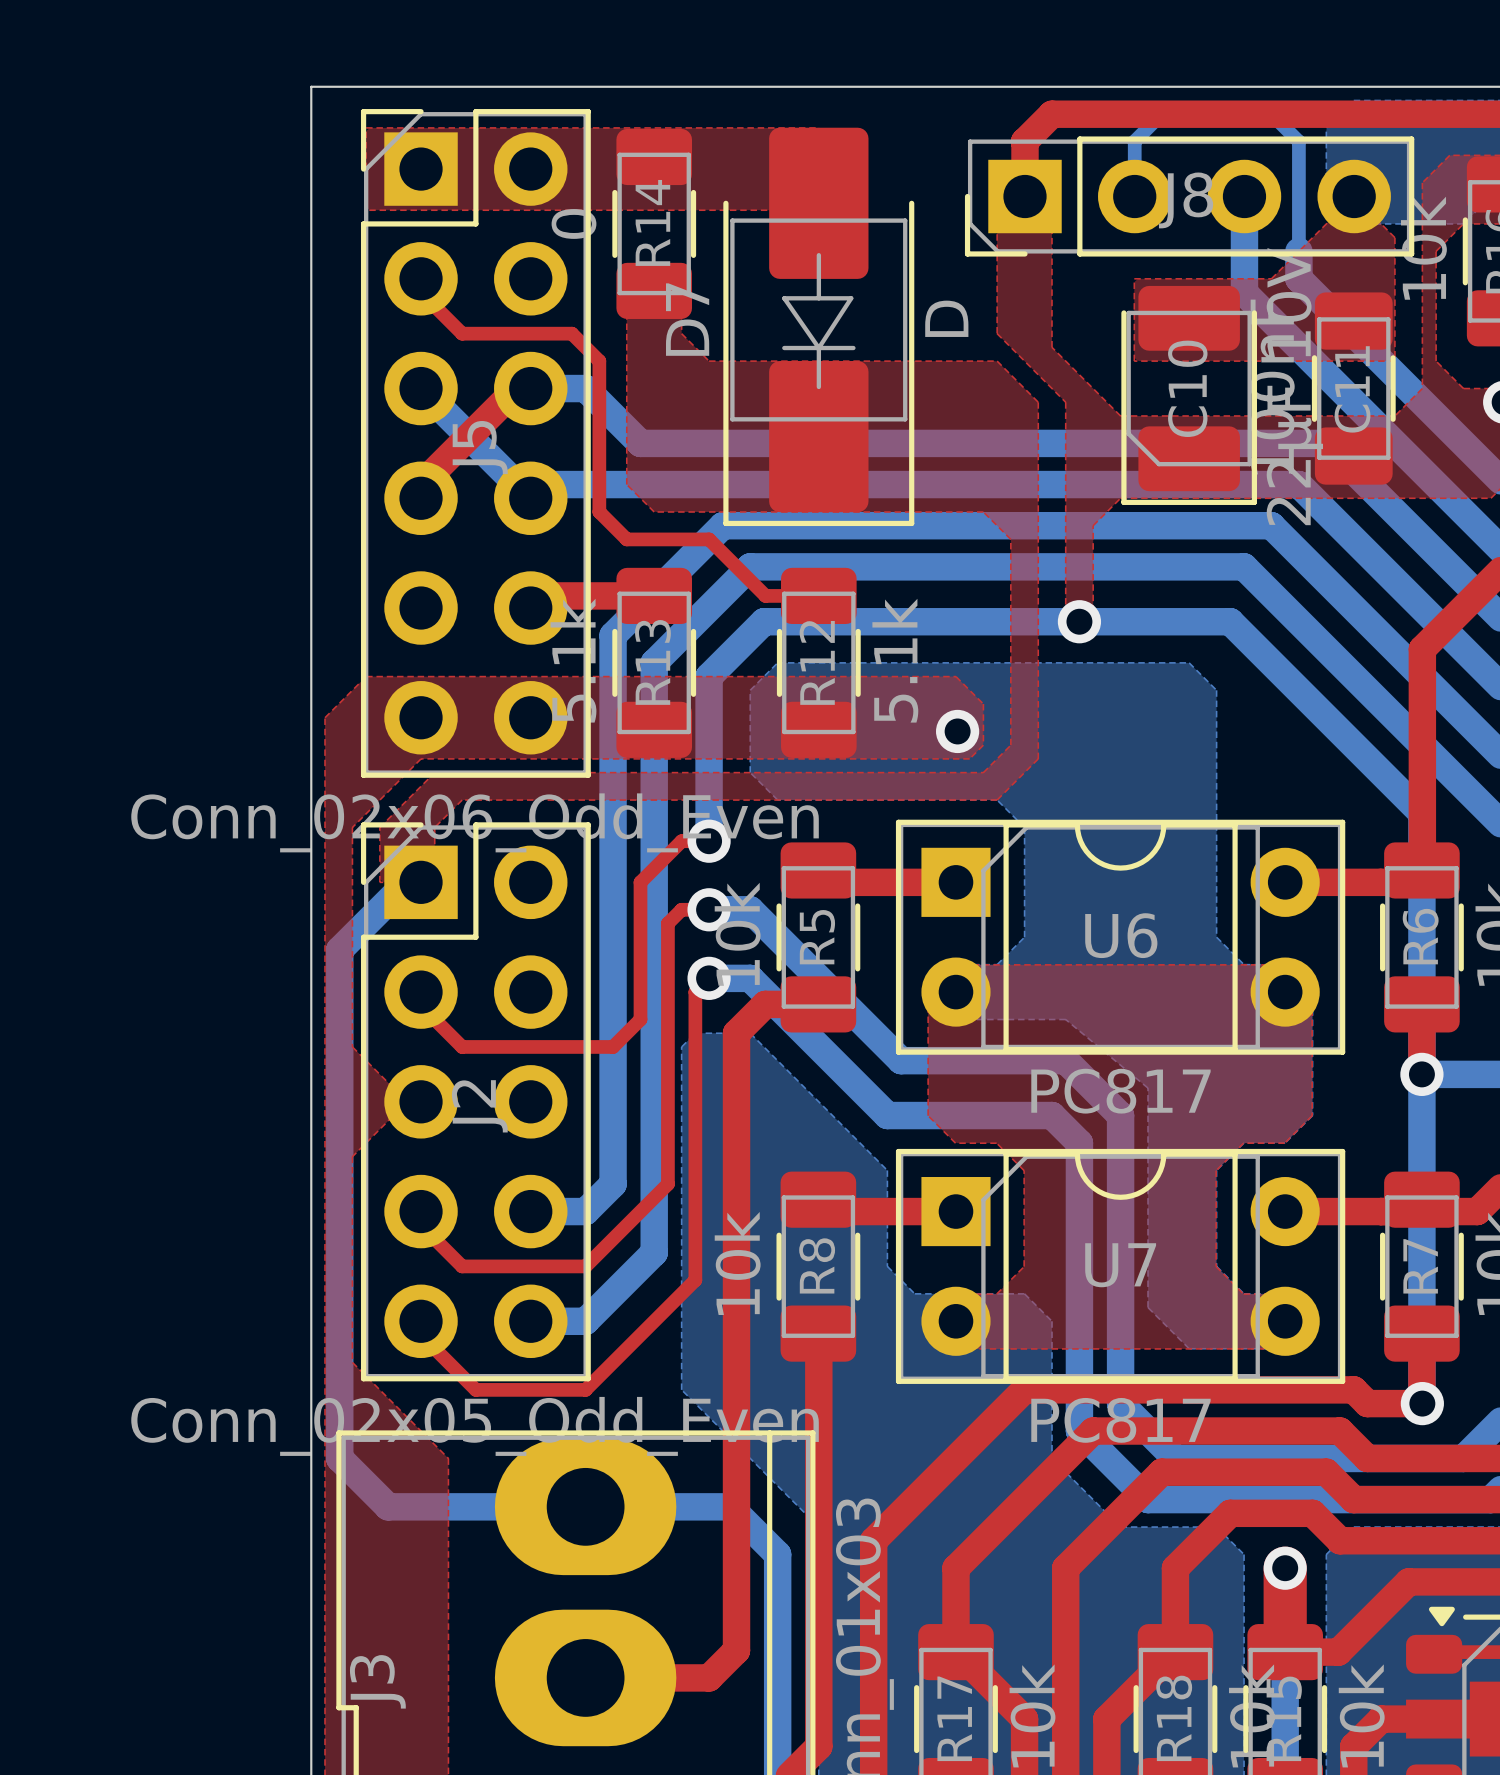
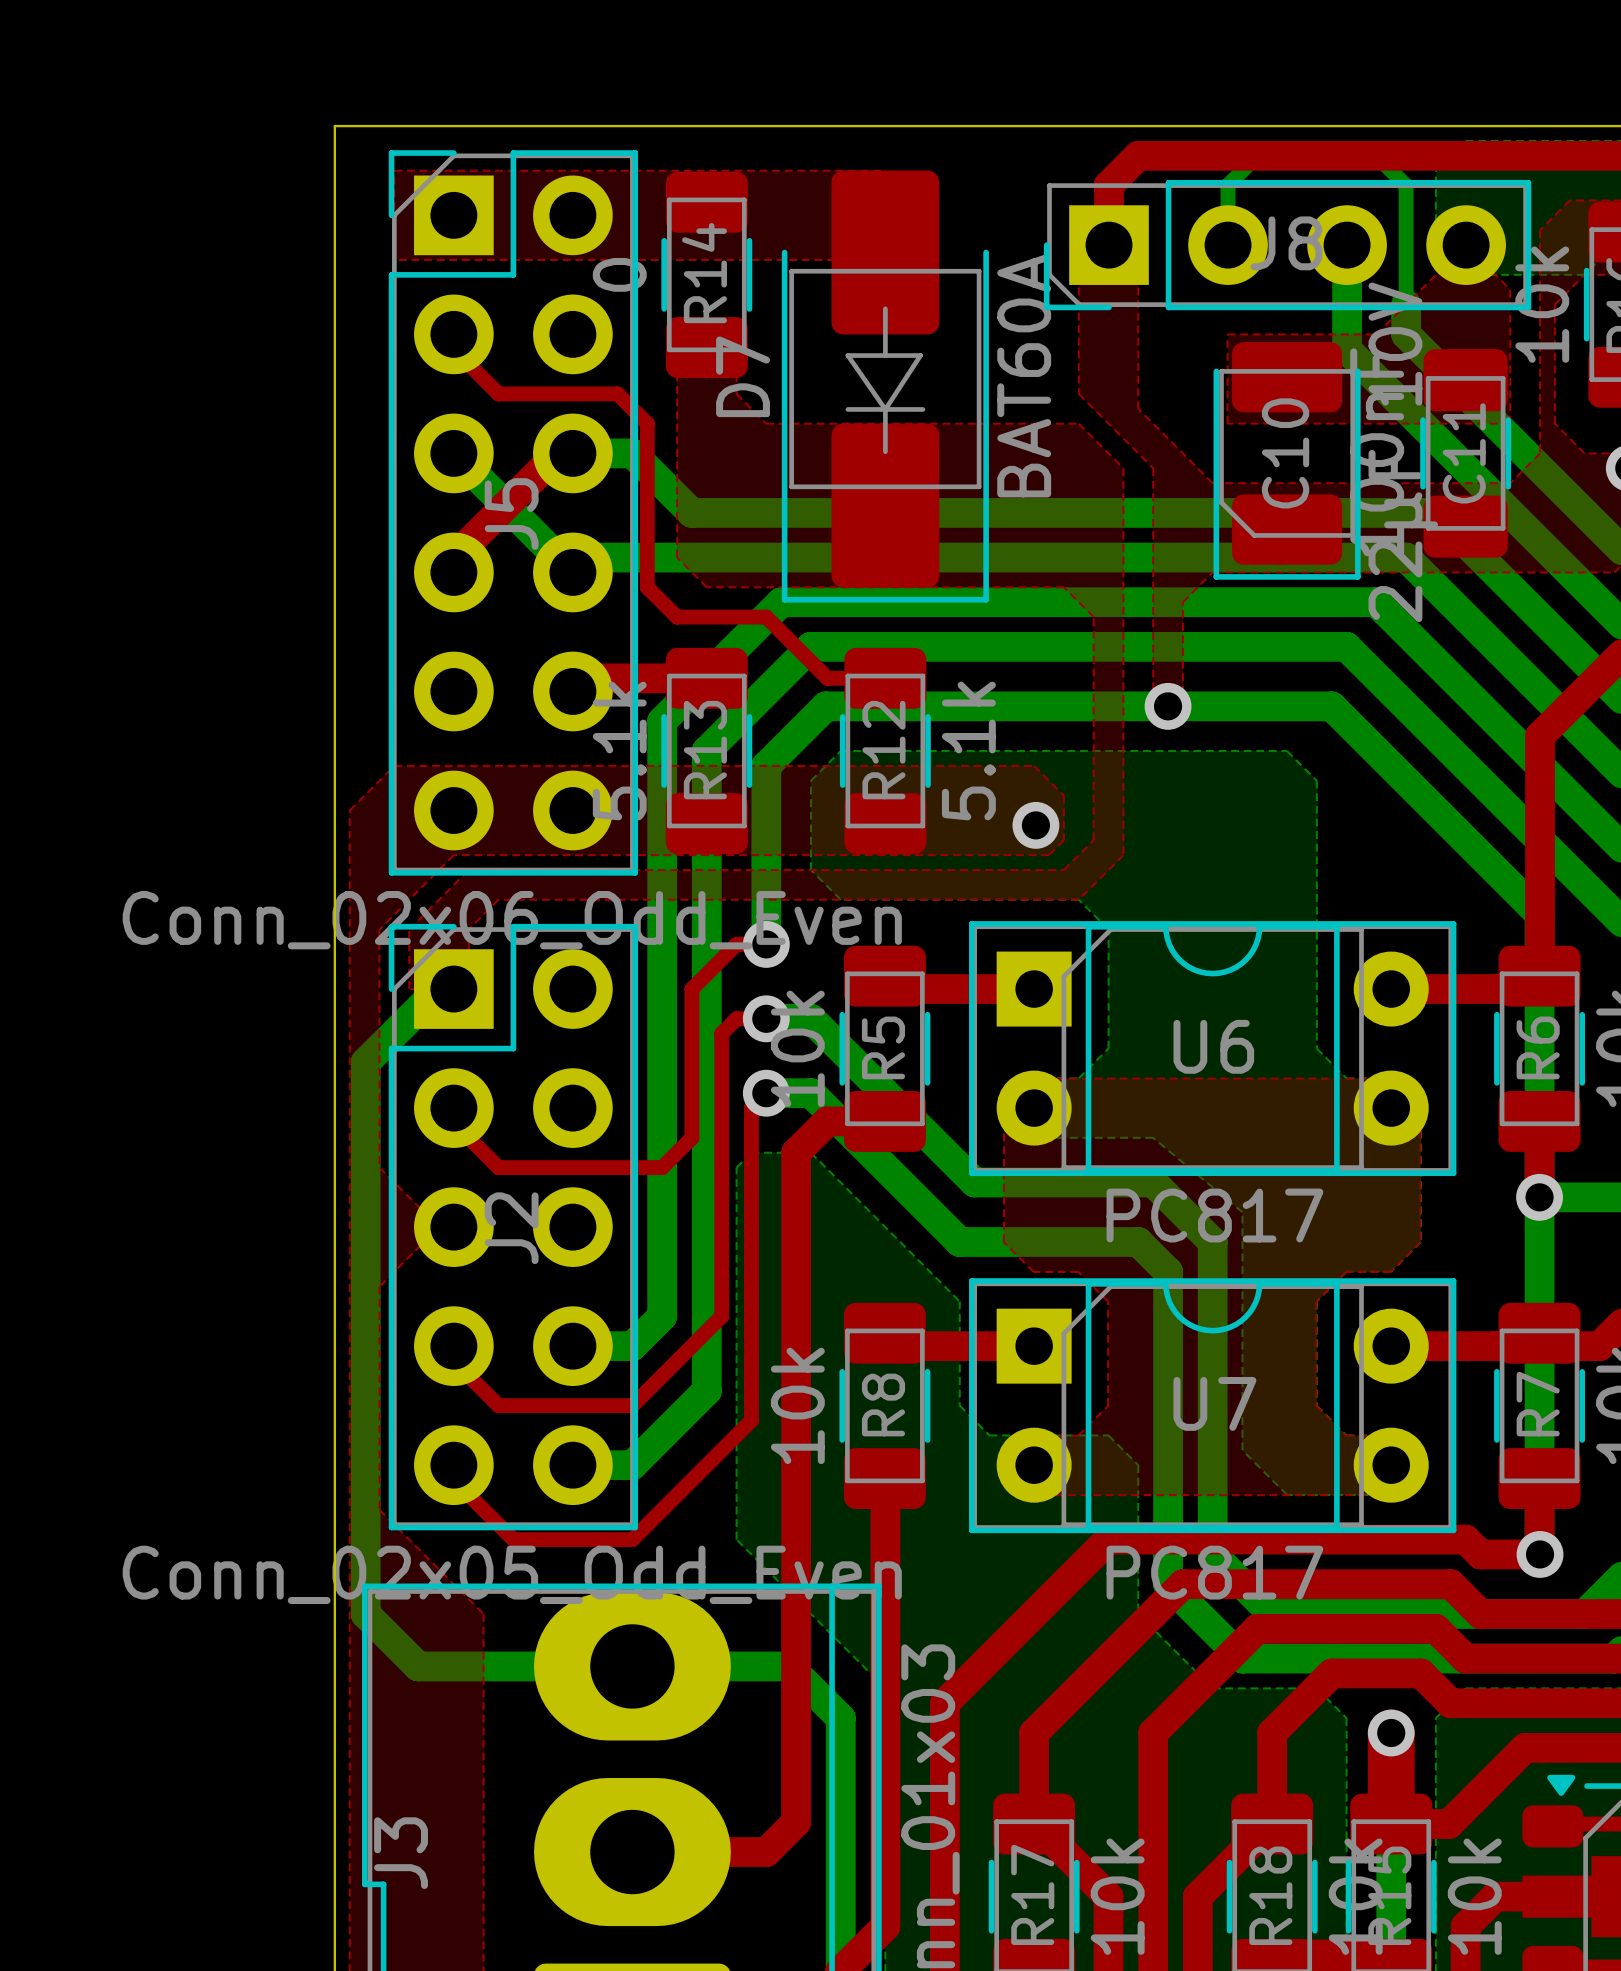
D7 value: D (946, 318) -> BAT60A (1024, 375)

